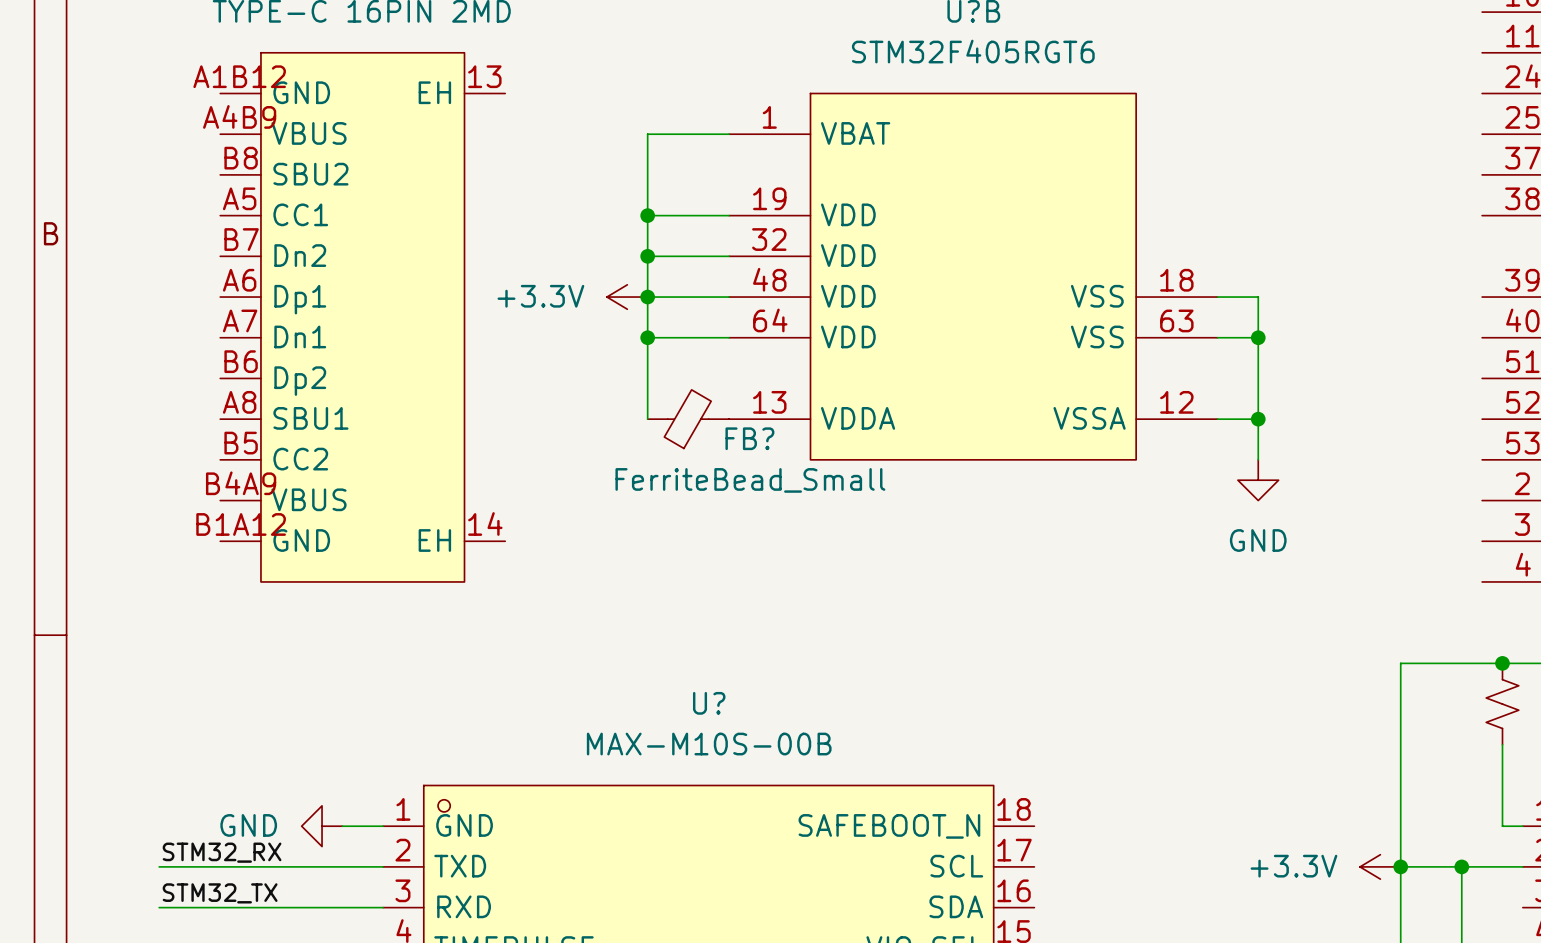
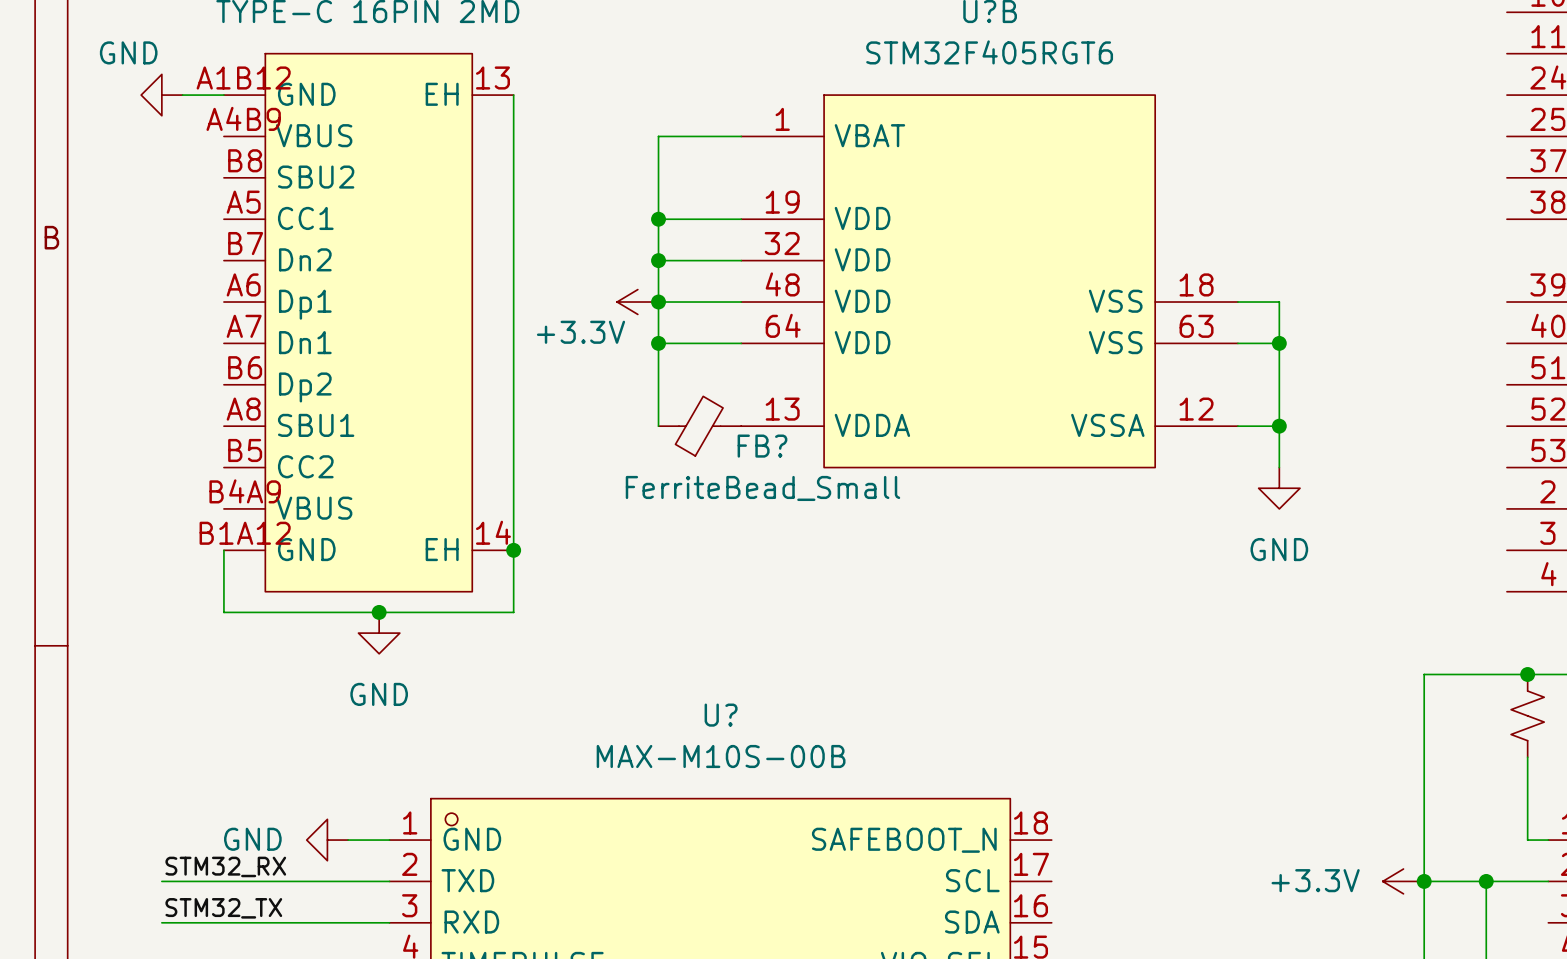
power symbol: none -> GND (161, 95)
wire: none -> (182, 95) (223, 95)
wire: none -> (513, 95) (513, 612) (223, 612) (223, 550)
power symbol text position: +3.3V (540, 296) -> +3.3V (581, 332)
junction: none -> (513, 550)
junction: none -> (379, 612)
power symbol: none -> GND (379, 633)

